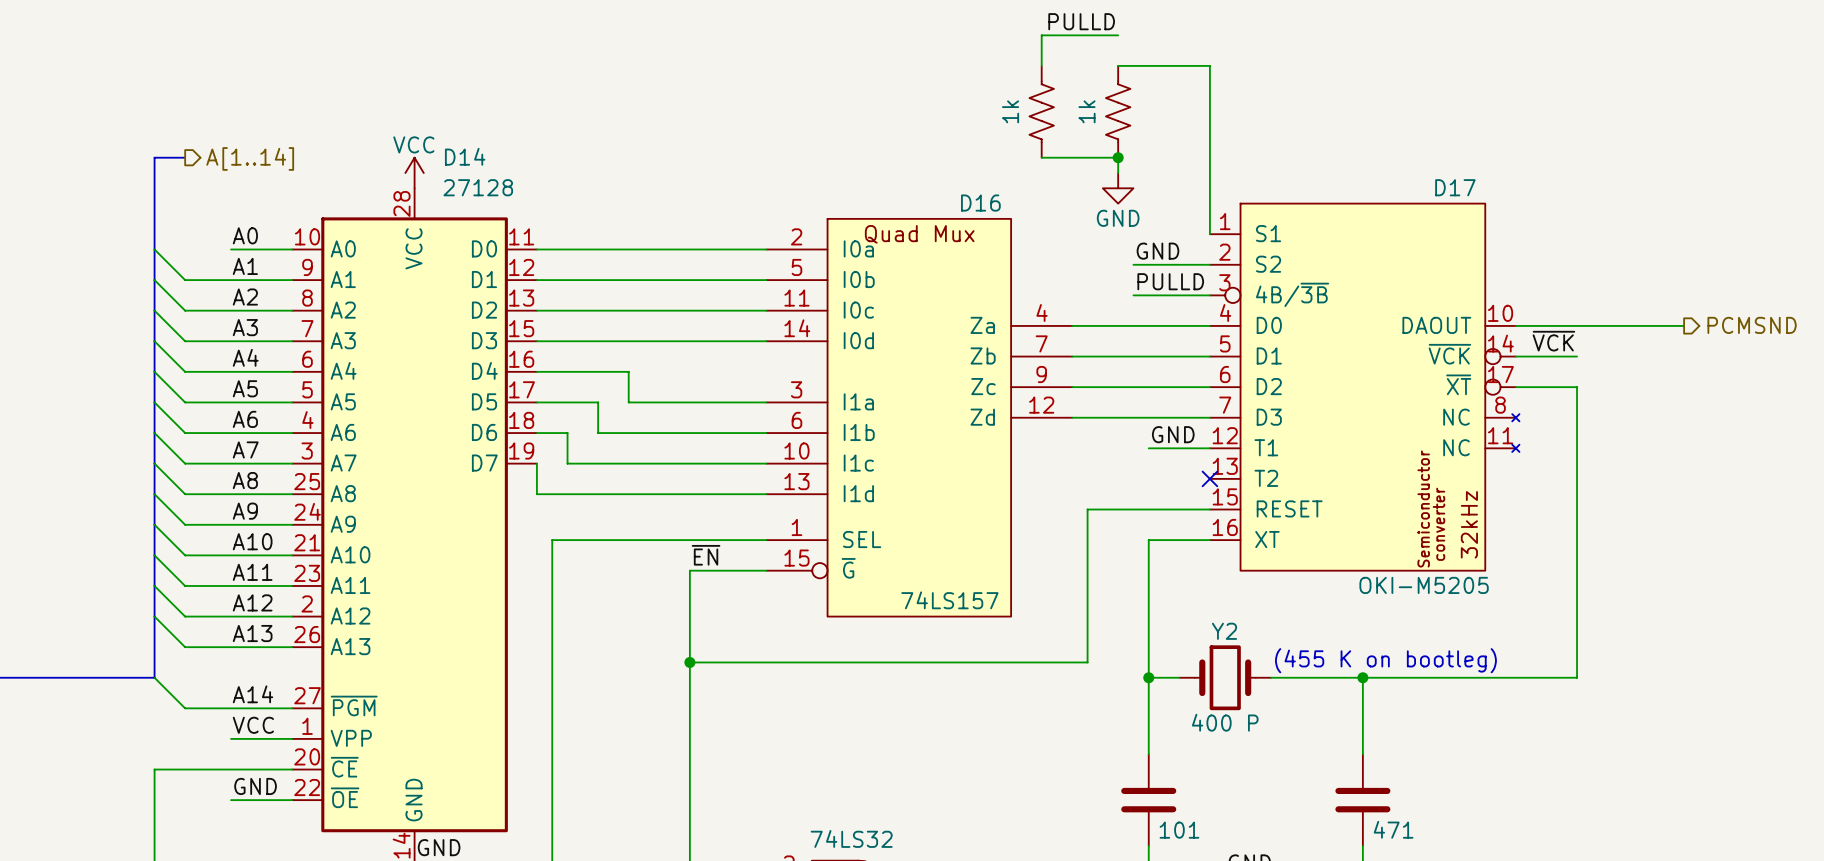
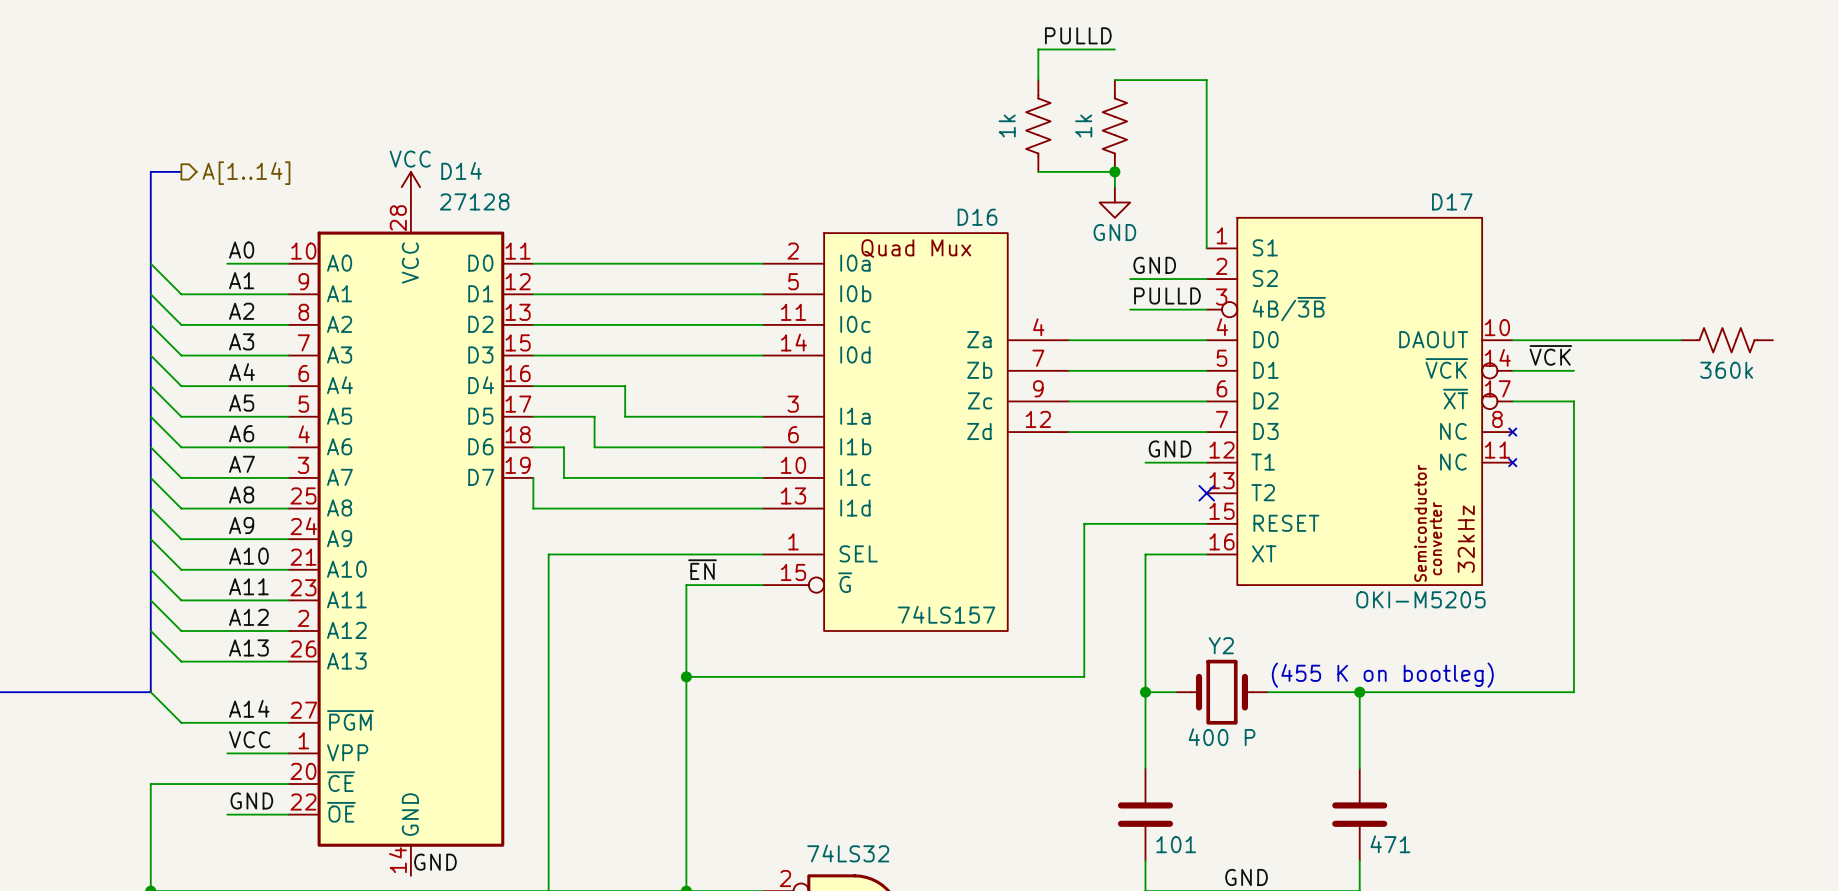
part: none -> 360k (1726, 340)
hierarchical label: PCMSND (1752, 325) -> none

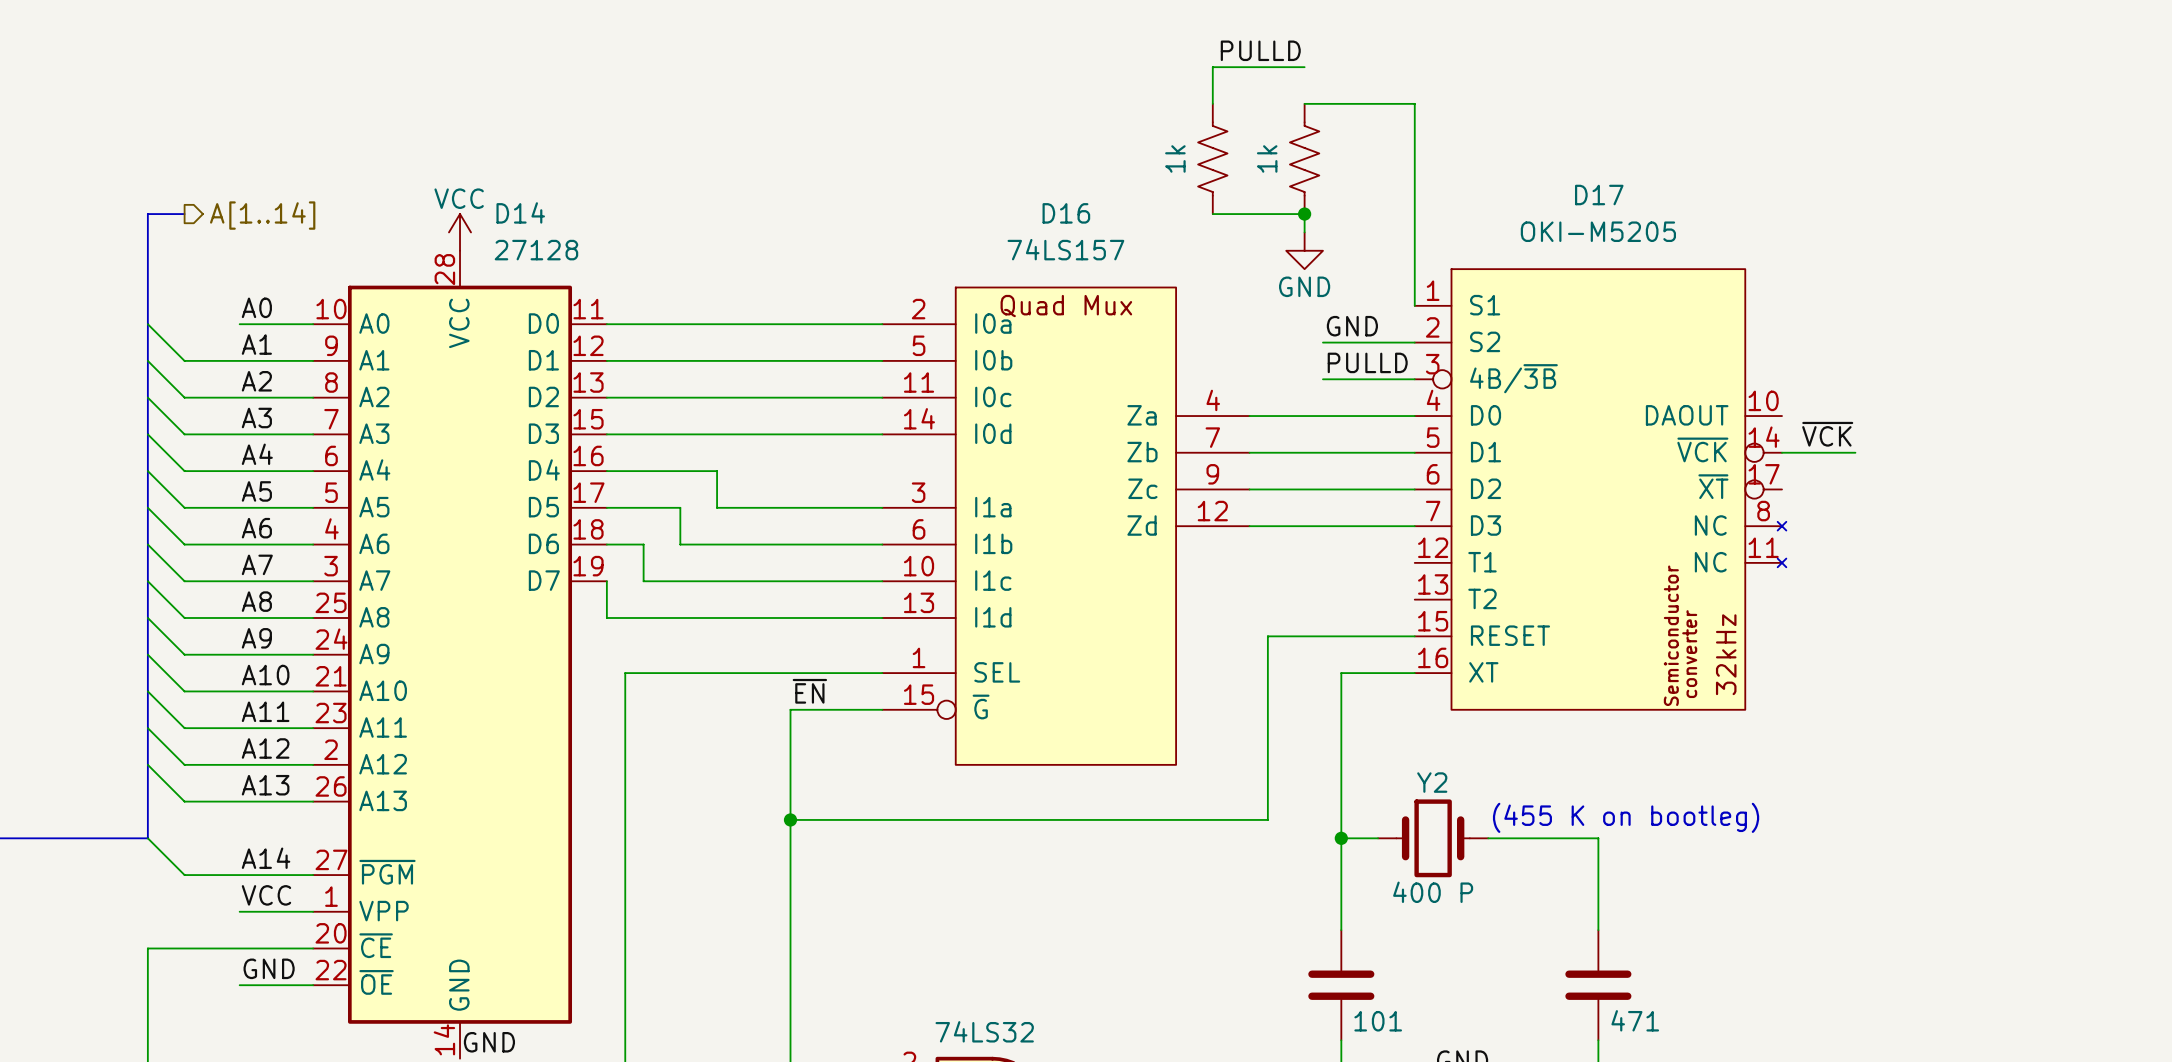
D17 name position: D17 (1452, 201) -> D17 (1599, 195)
D16 name position: D16 (977, 217) -> D16 (1066, 213)
wire: (1512, 340) (1681, 340) -> none
part: 360k (1726, 340) -> none
wire: (1512, 401) (1573, 401) (1573, 692) (1359, 692) -> none
label: GND (1170, 449) -> none
wire: (1145, 462) (1206, 462) -> none
no-connect mark: (1206, 493) -> none
D17 value position: OKI-M5205 (1420, 599) -> OKI-M5205 (1598, 231)
D16 value position: 74LS157 (946, 614) -> 74LS157 (1065, 249)
junction: (1359, 692) -> none

